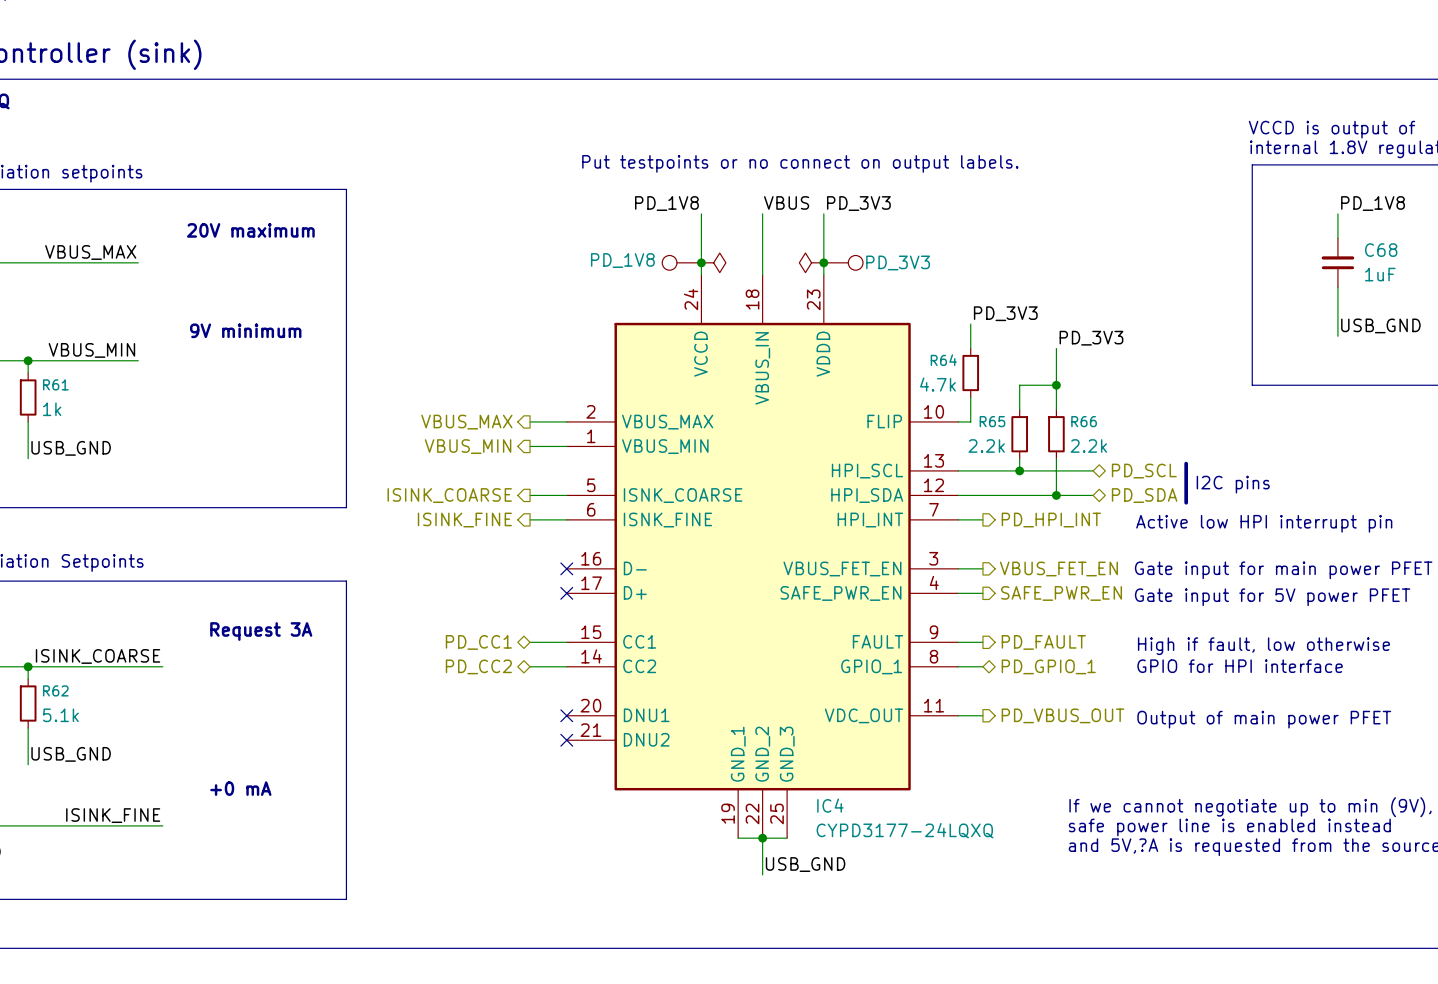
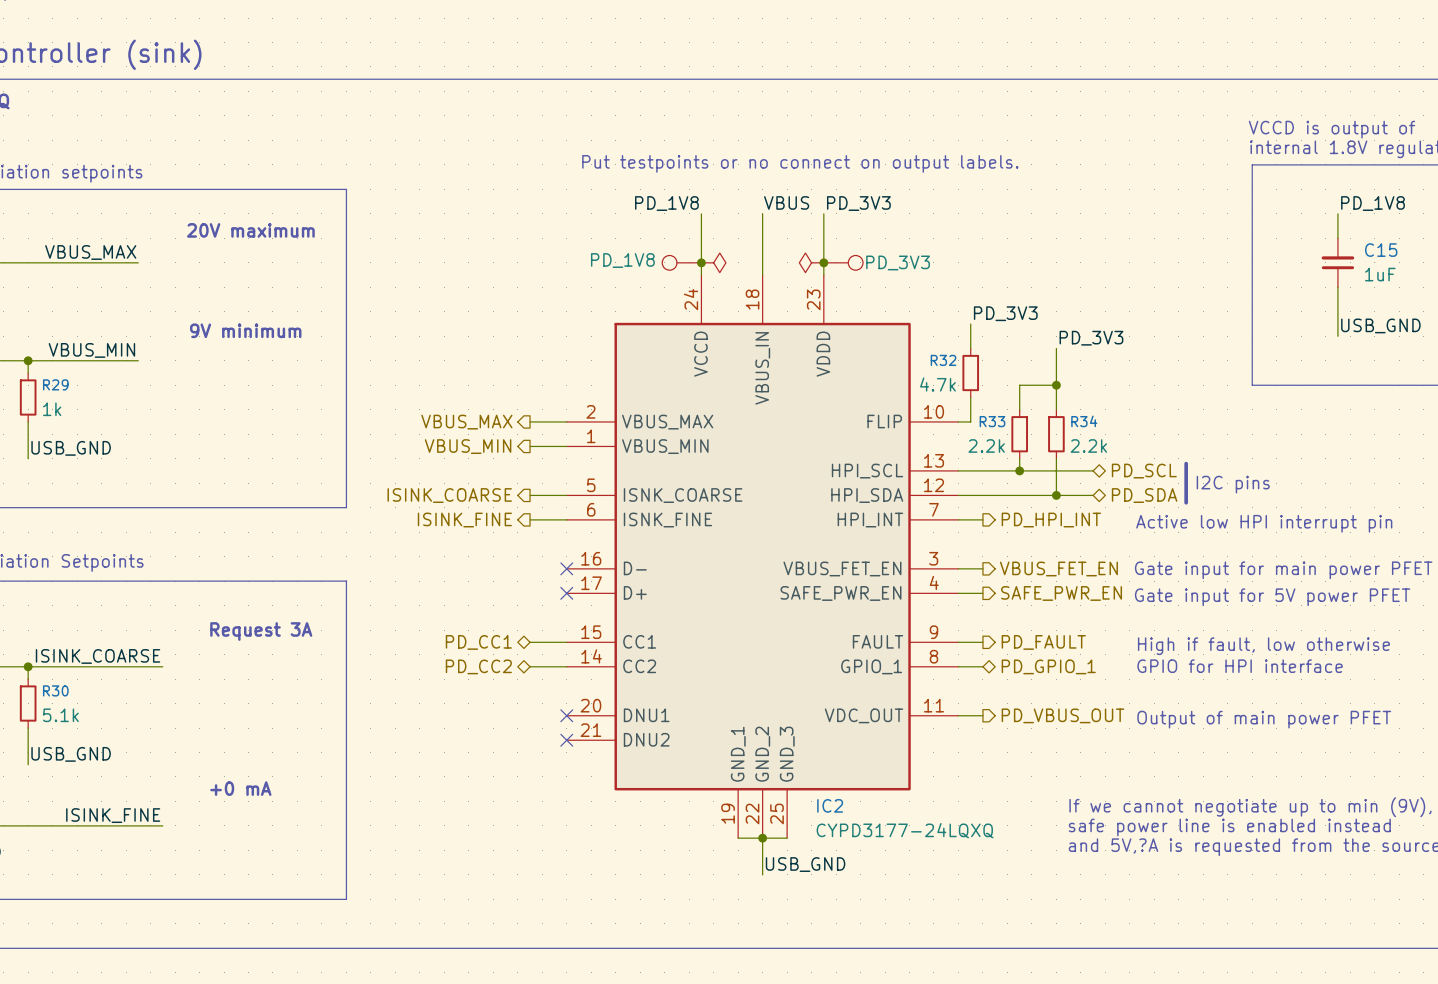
C68 name: C68 (1381, 250) -> C15 (1381, 250)
R64 name: R64 (943, 360) -> R32 (943, 360)
R61 name: R61 (55, 384) -> R29 (55, 384)
R65 name: R65 (992, 421) -> R33 (992, 421)
R66 name: R66 (1084, 421) -> R34 (1084, 421)
R62 name: R62 (55, 690) -> R30 (55, 690)
IC4 name: IC4 (830, 805) -> IC2 (830, 805)

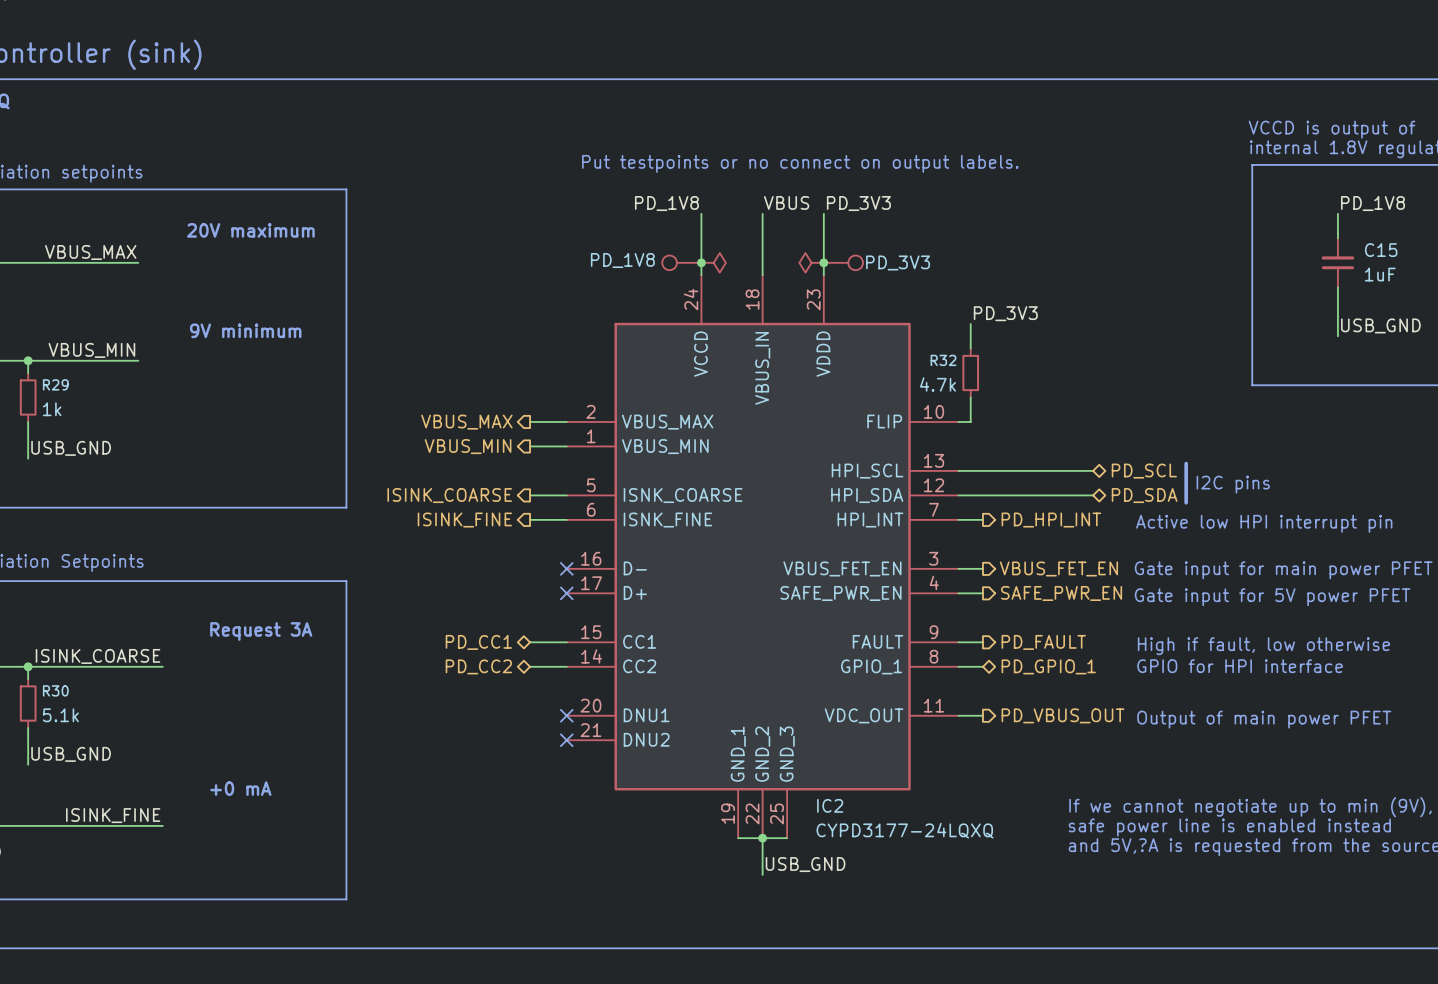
label: PD_3V3 (1091, 338) -> none
wire: (1056, 348) (1056, 409) -> none
wire: (1056, 385) (1019, 385) (1019, 409) -> none
junction: (1056, 385) -> none
R33: 2.2k (1019, 434) -> none
R34: 2.2k (1056, 434) -> none
wire: (1019, 458) (1019, 470) -> none
wire: (1056, 458) (1056, 495) -> none
junction: (1019, 470) -> none
junction: (1056, 495) -> none

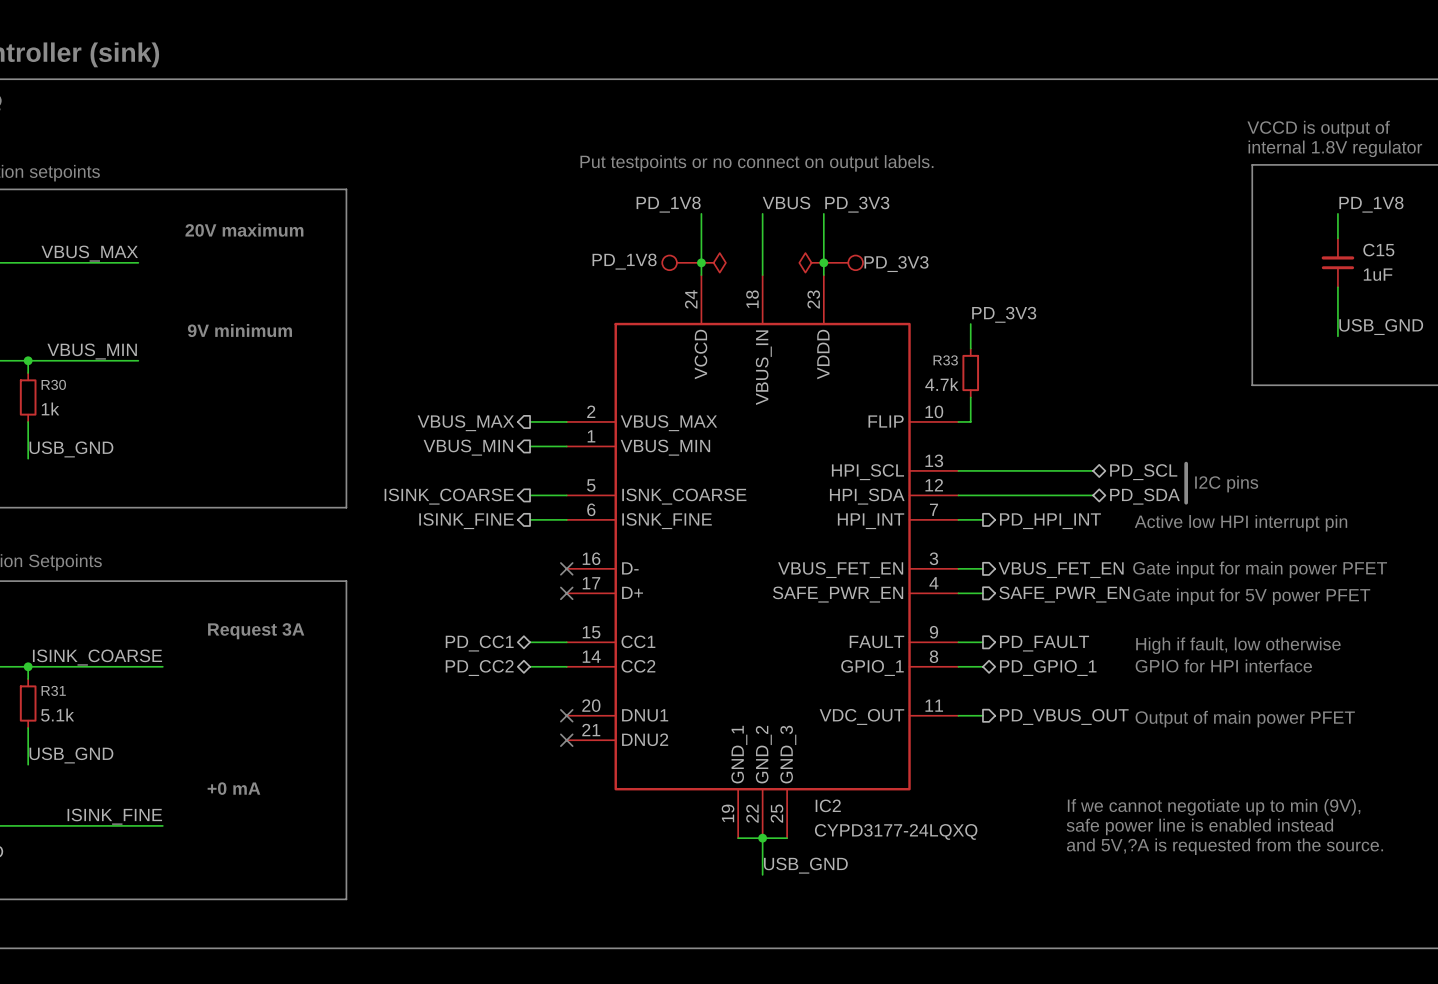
R32 name: R32 (943, 360) -> R33 (945, 360)
R29 name: R29 (55, 384) -> R30 (53, 384)
R30 name: R30 (55, 690) -> R31 (53, 690)

